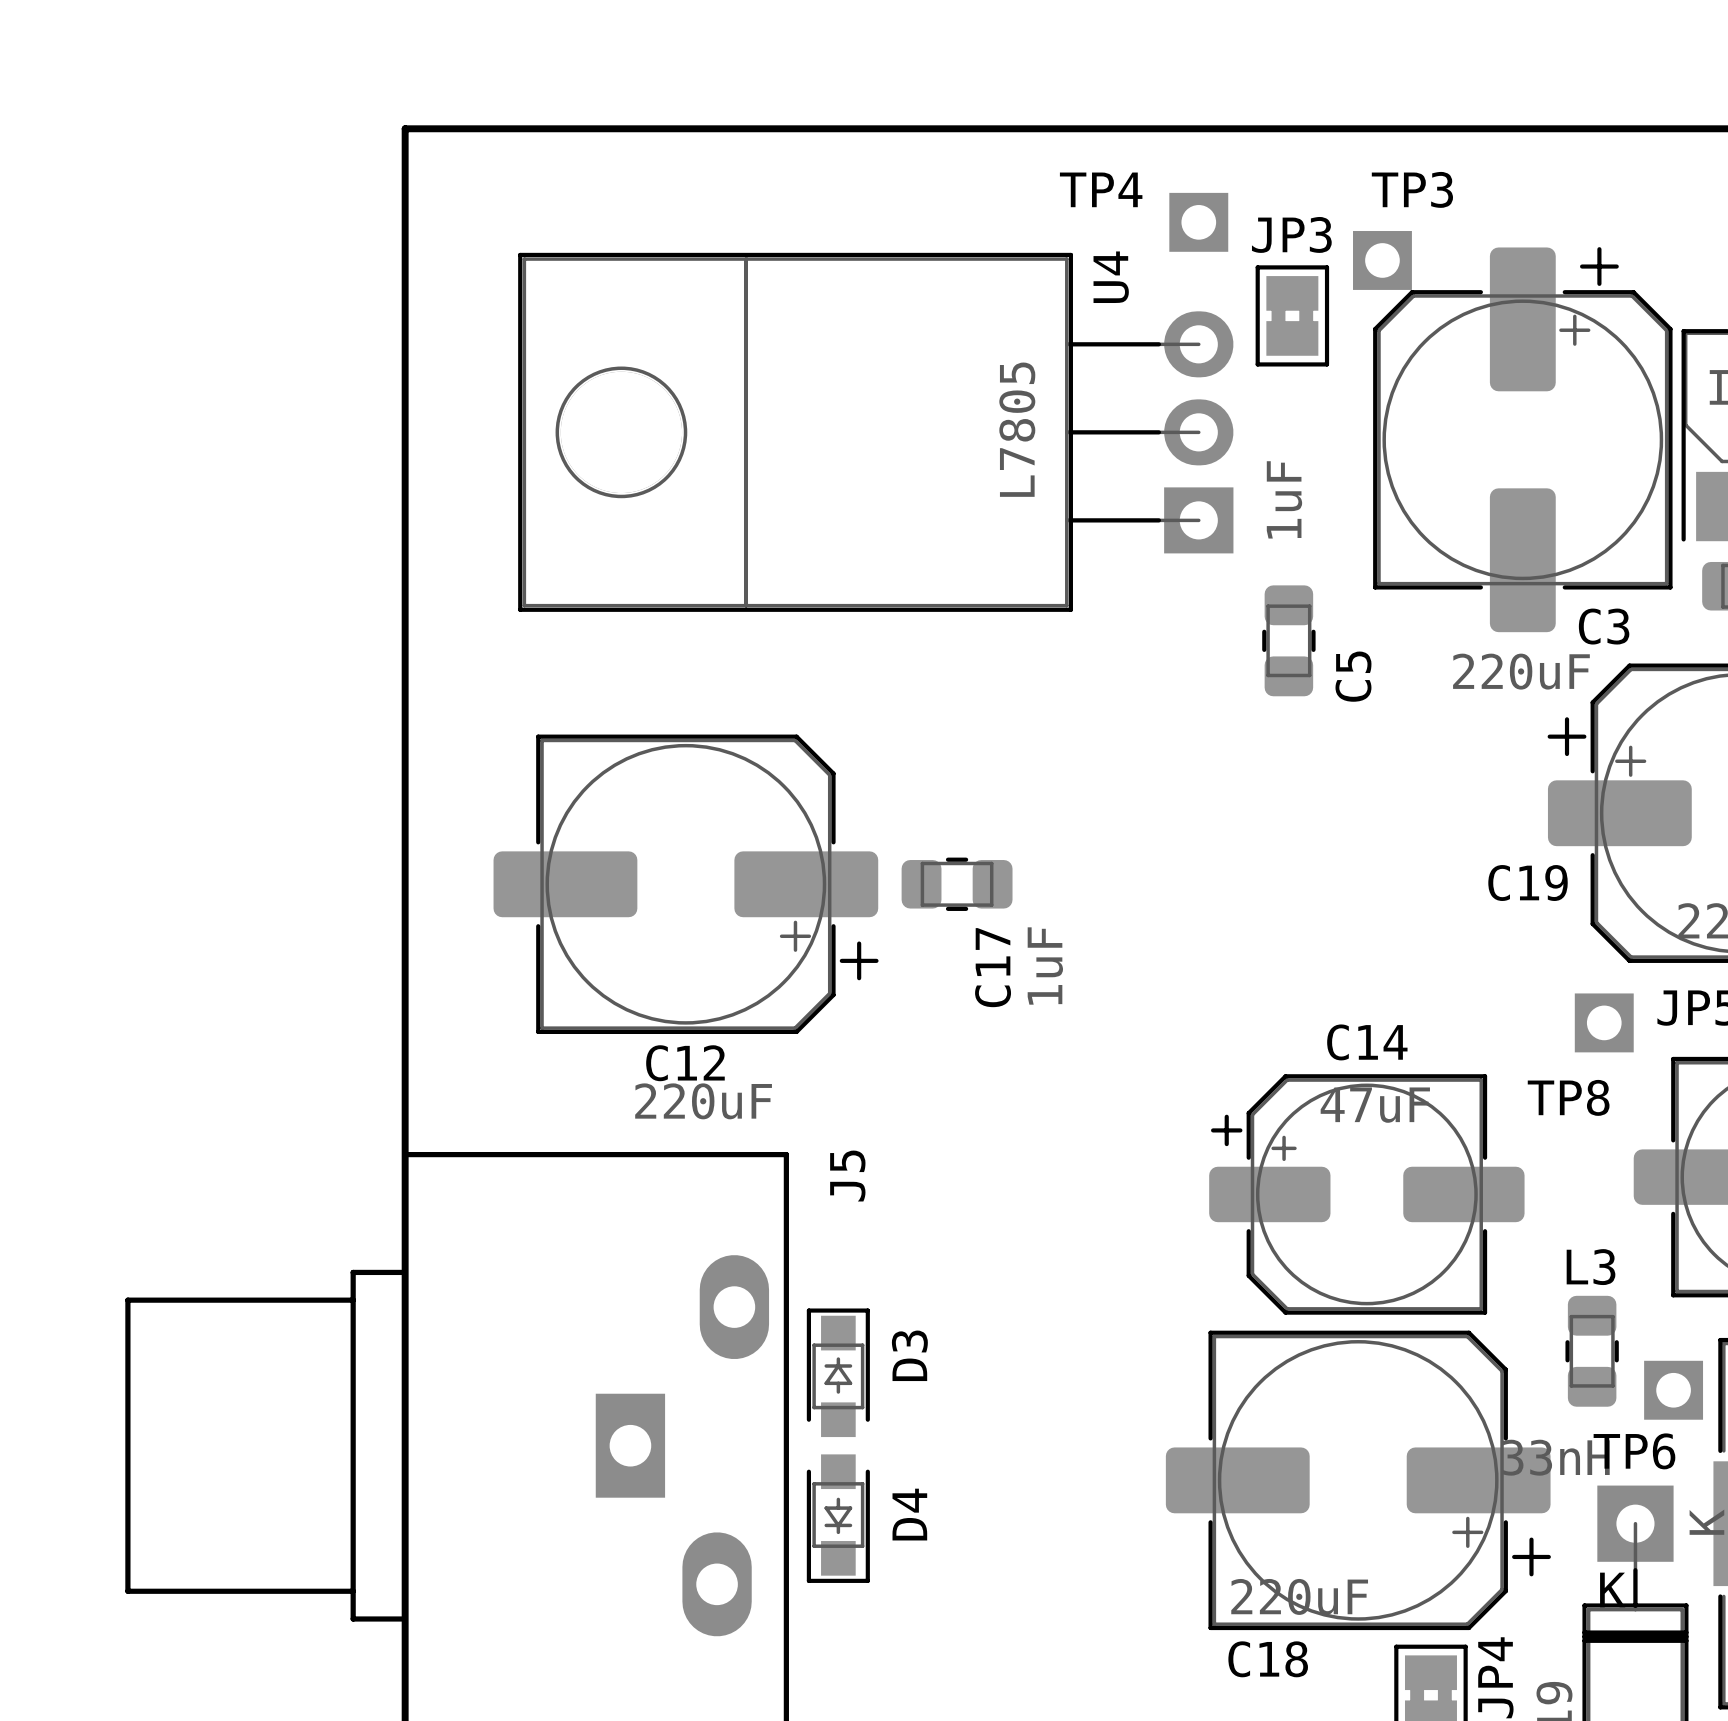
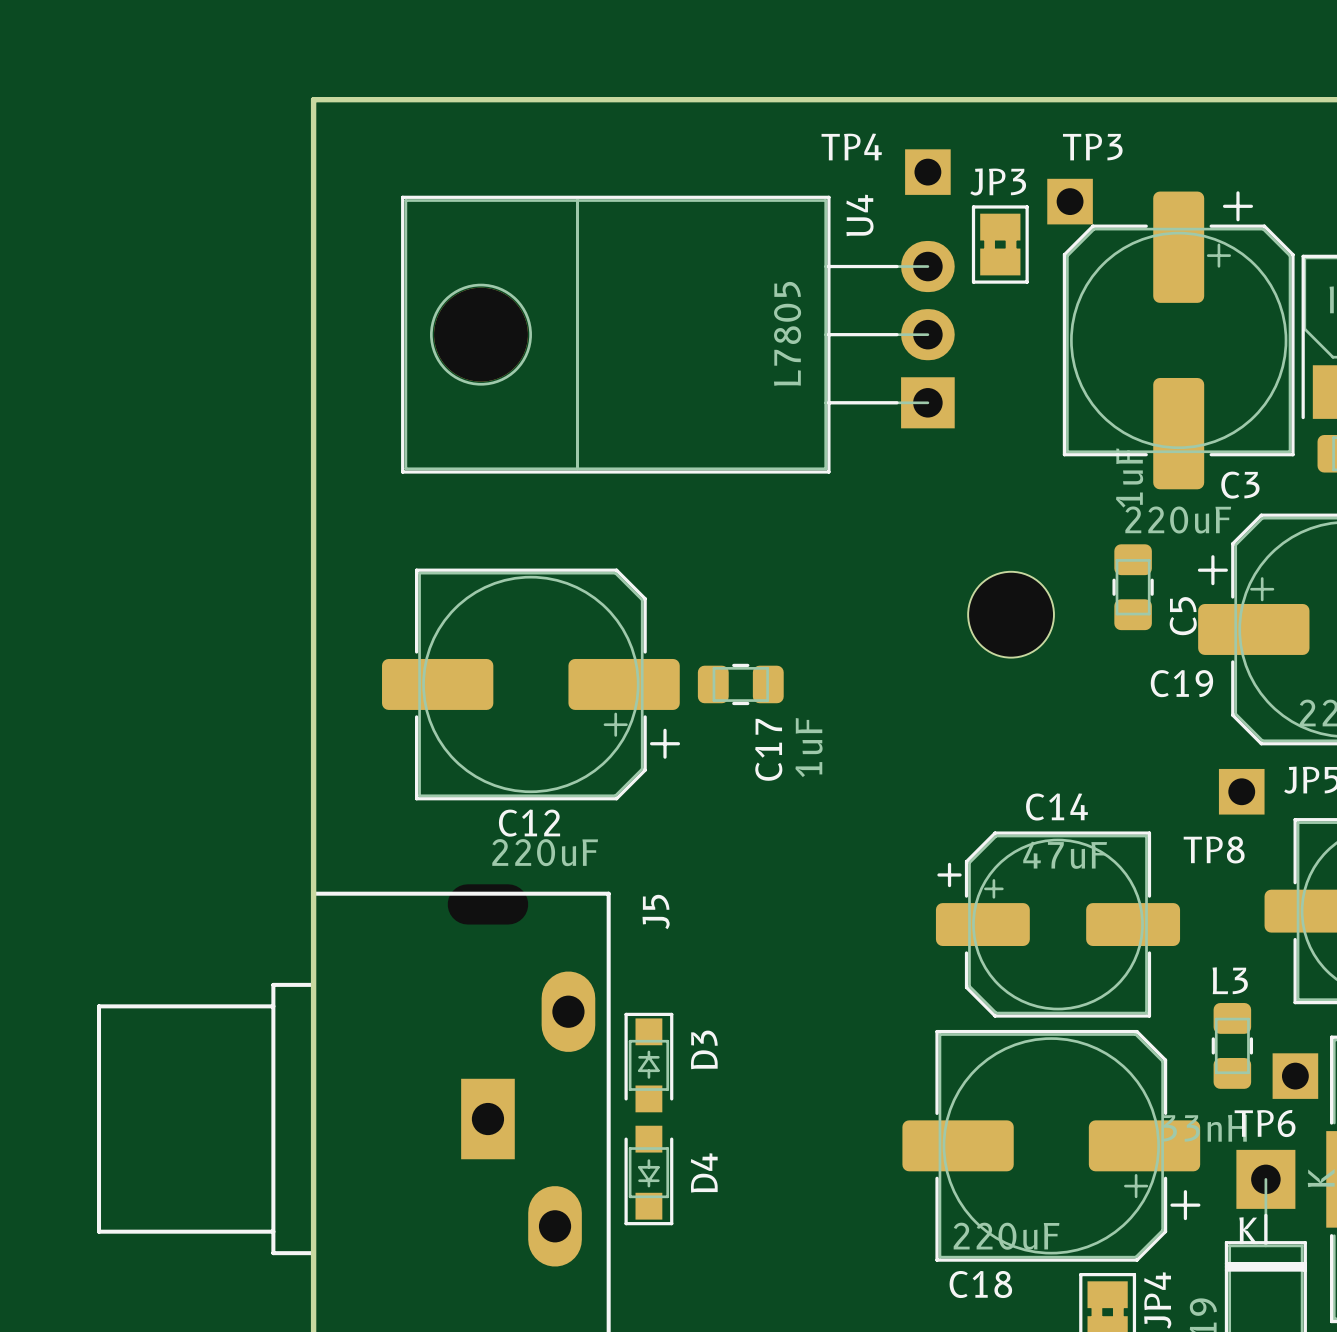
C5 position: (1288, 640) -> (1133, 587)
part: none -> (1011, 614)

